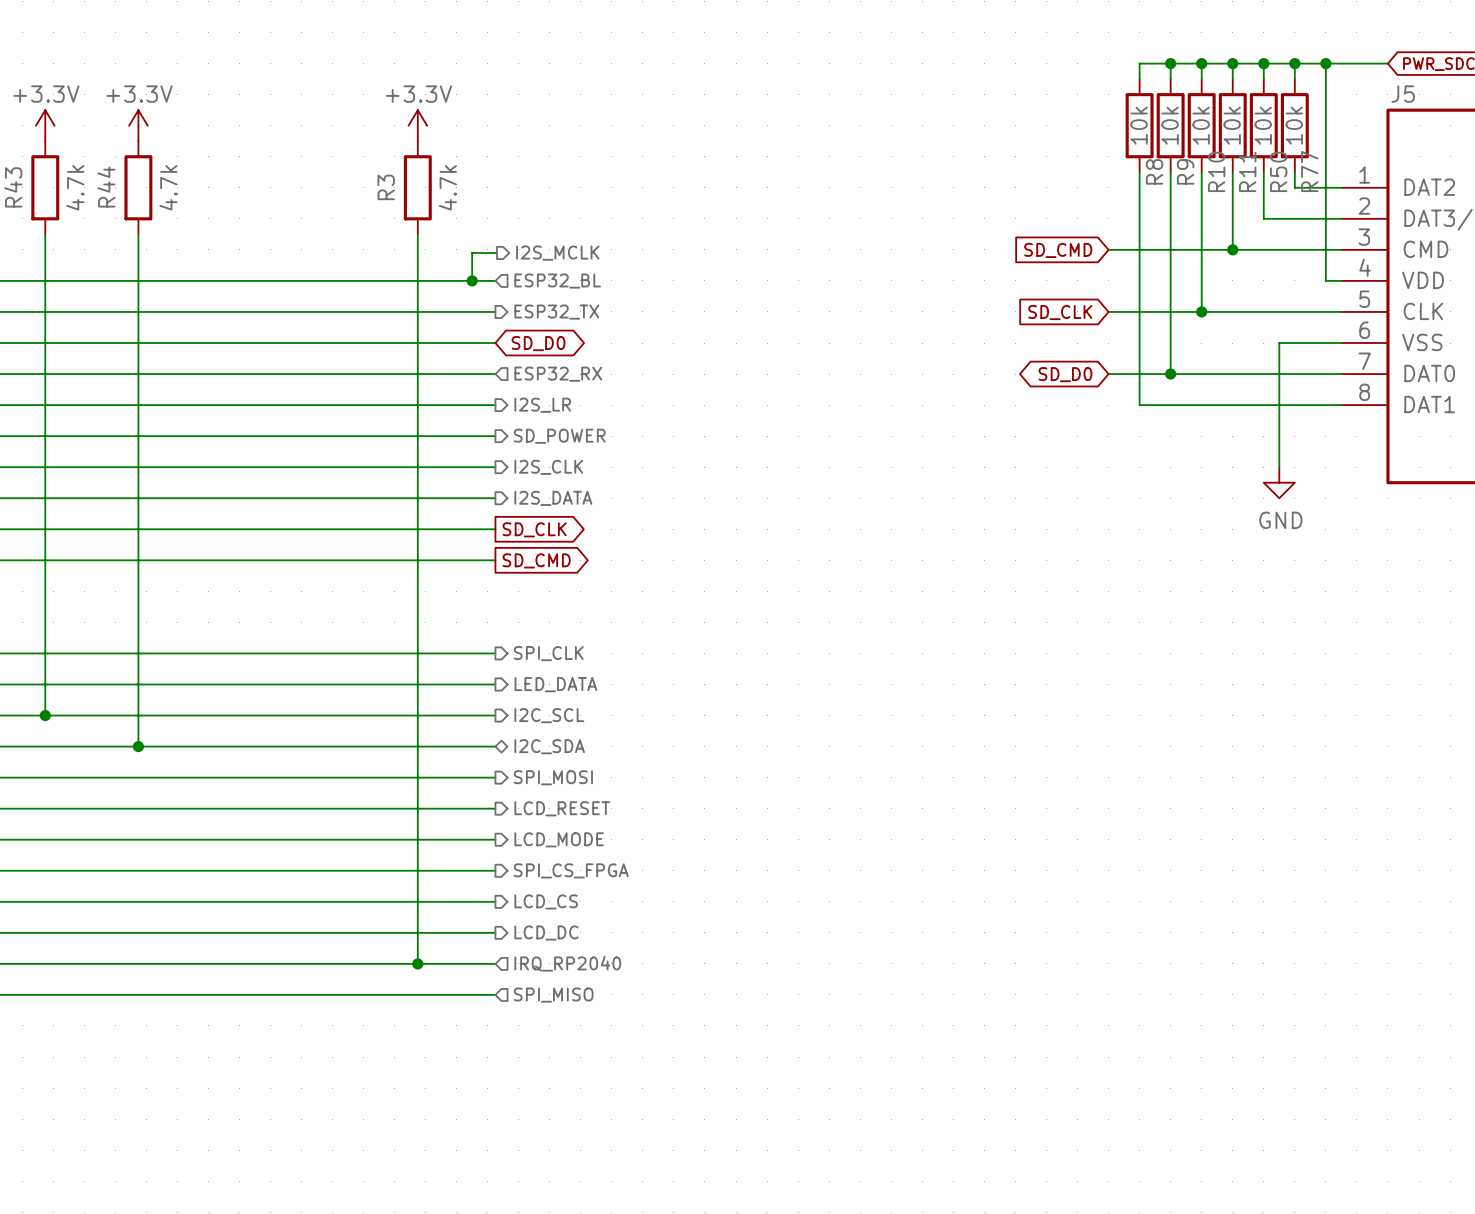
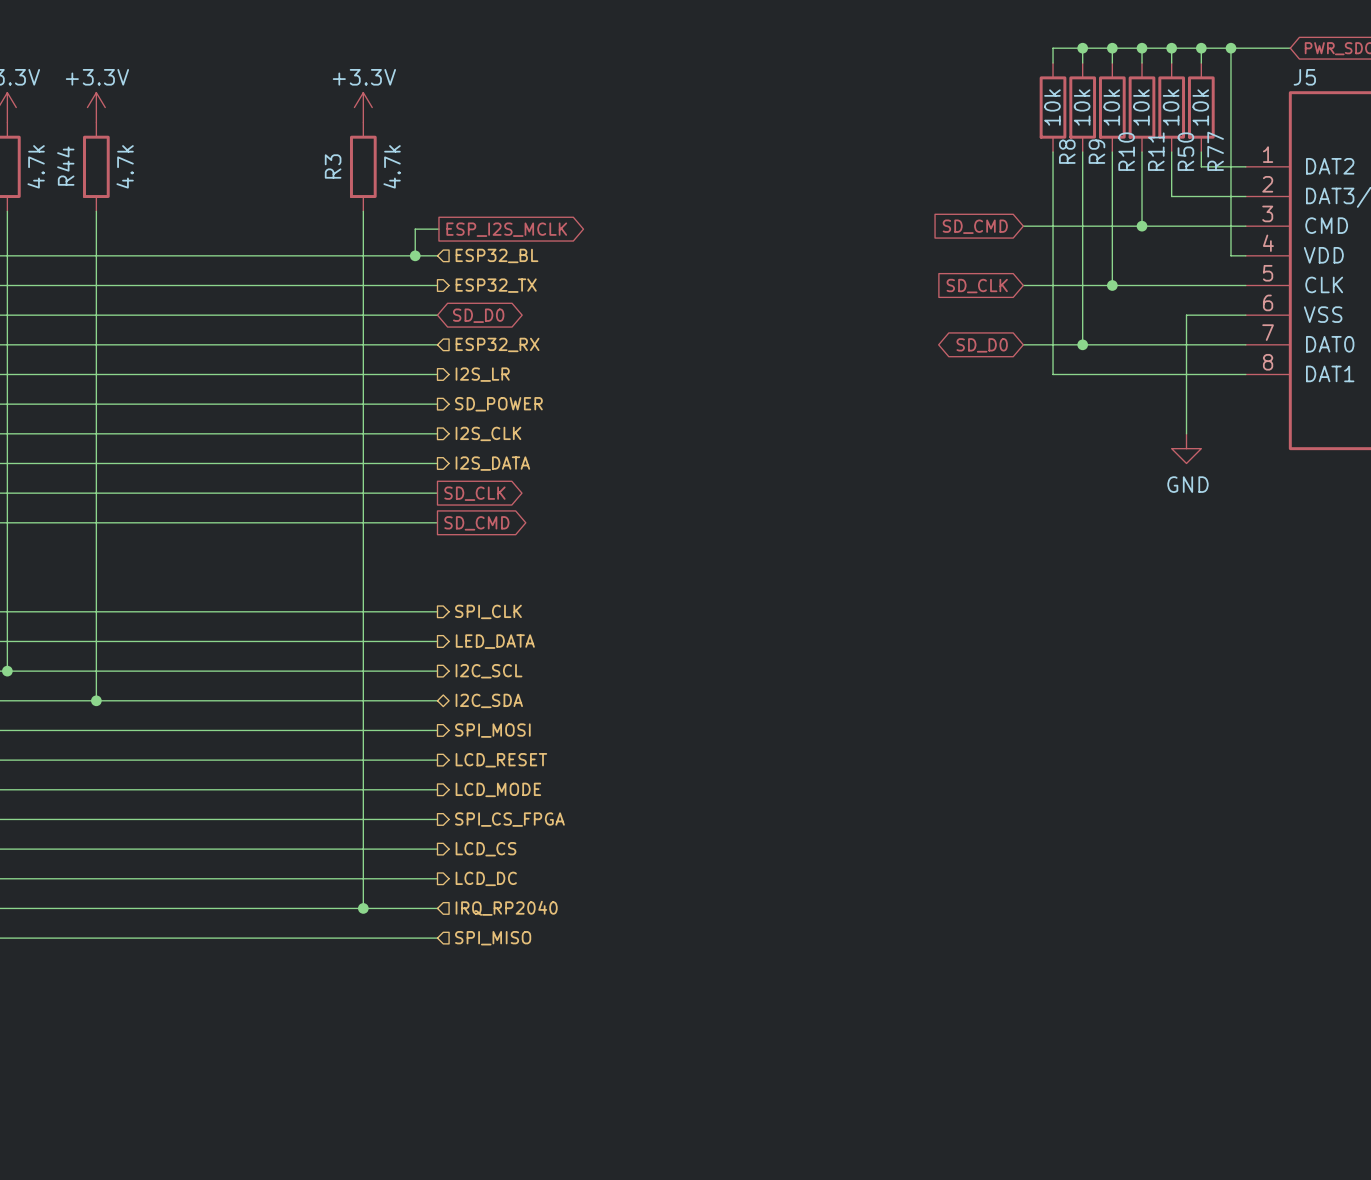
hierarchical label: I2S_MCLK (557, 253) -> none
global label: none -> ESP_I2S_MCLK (506, 229)

